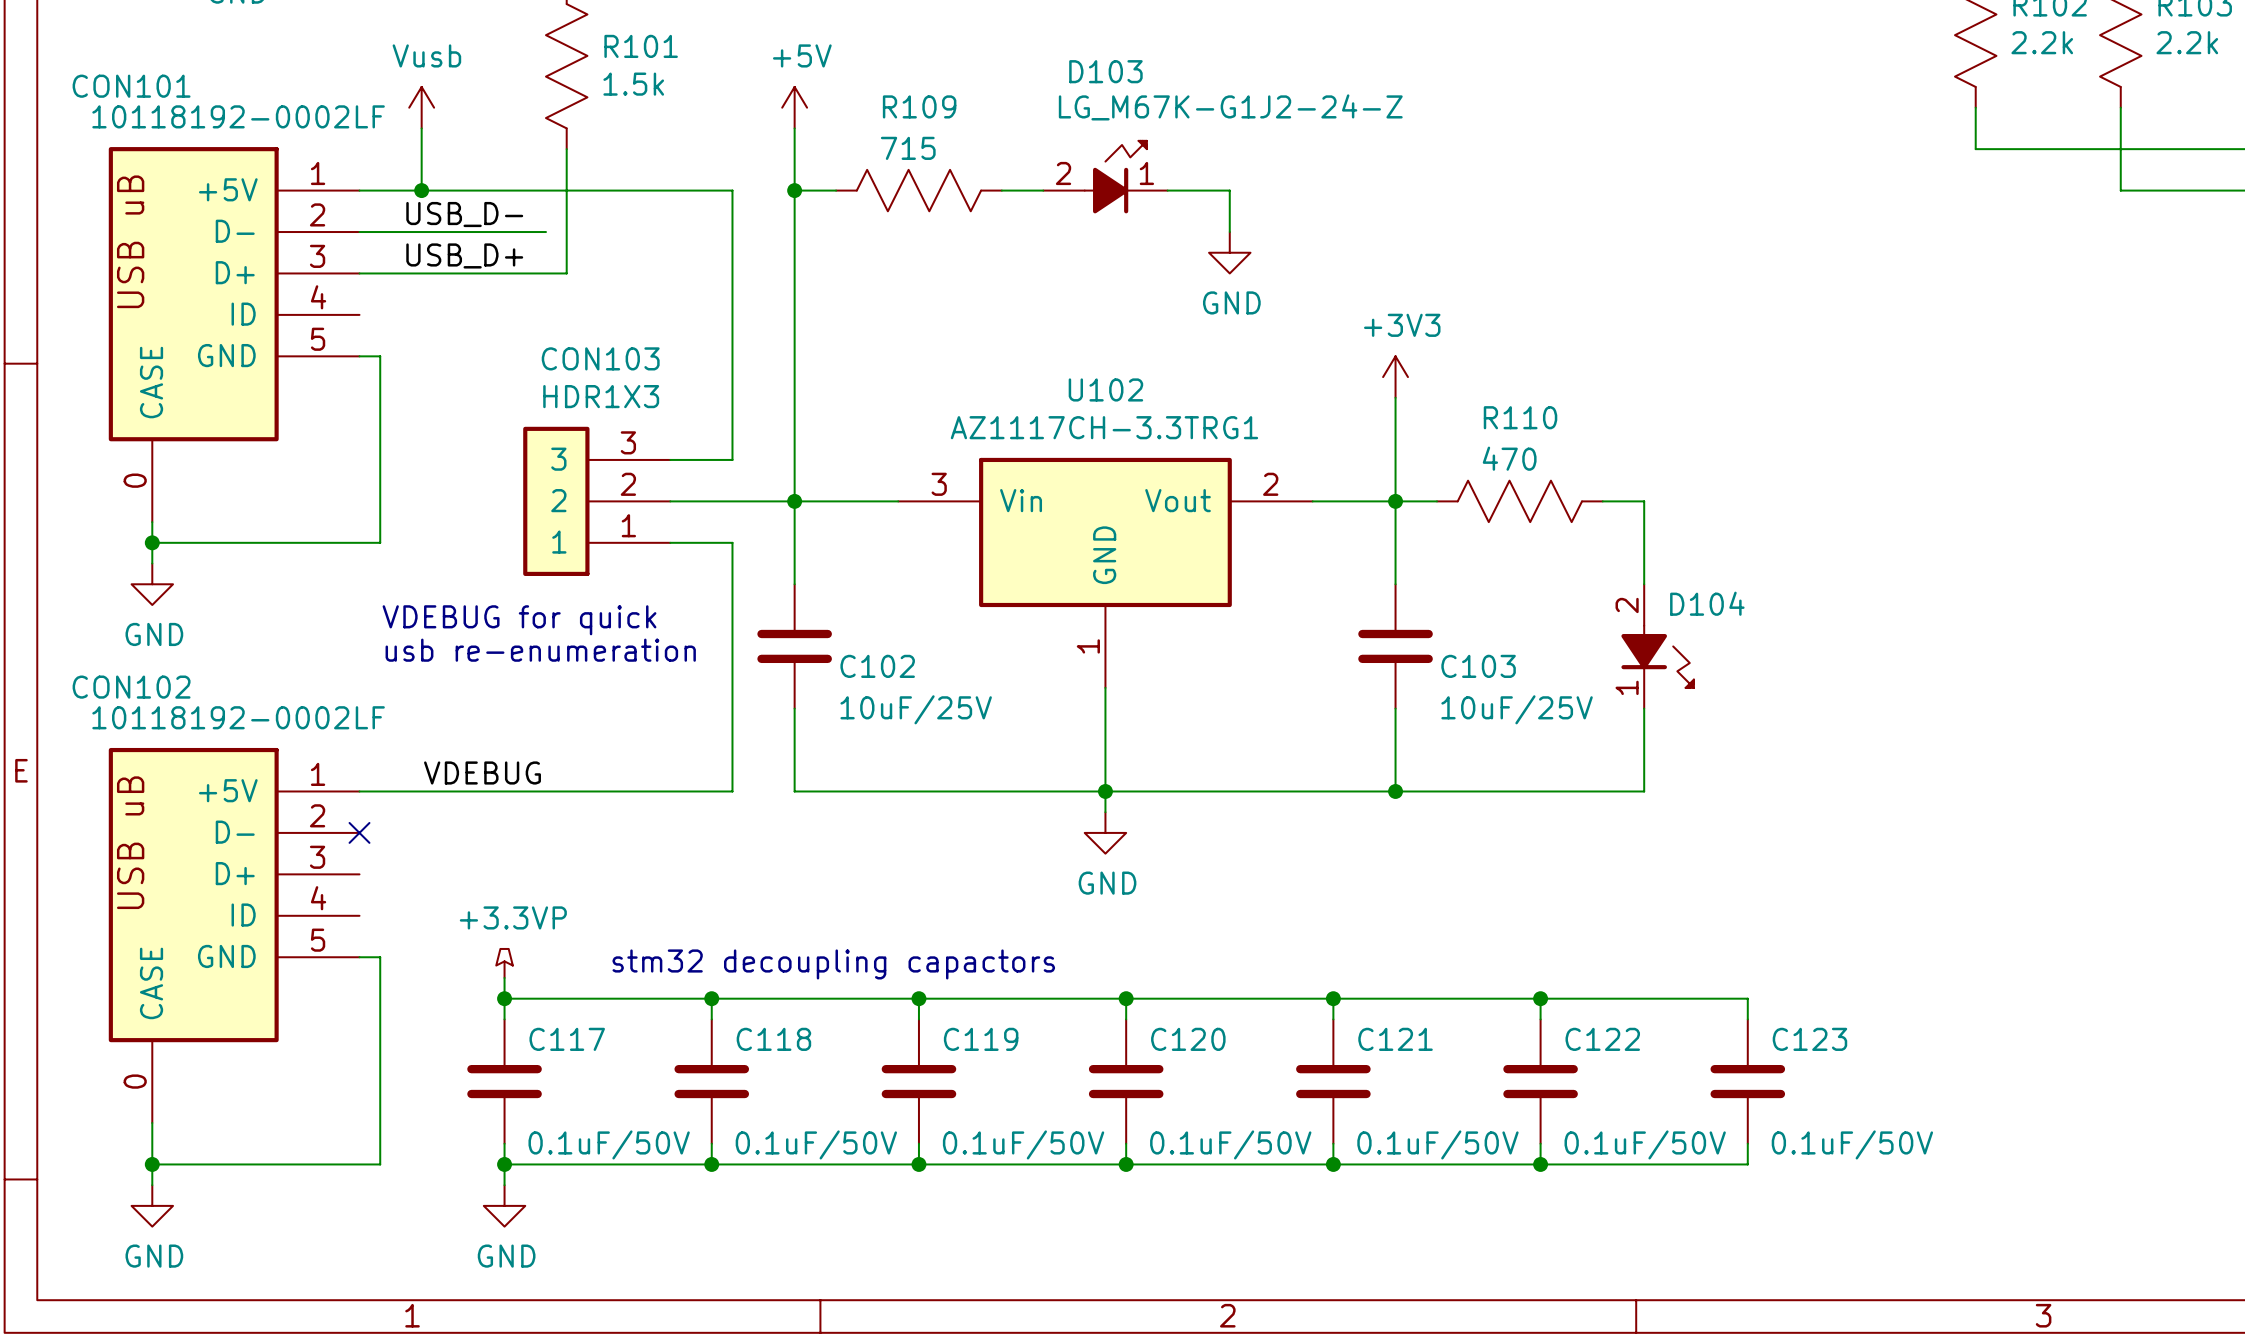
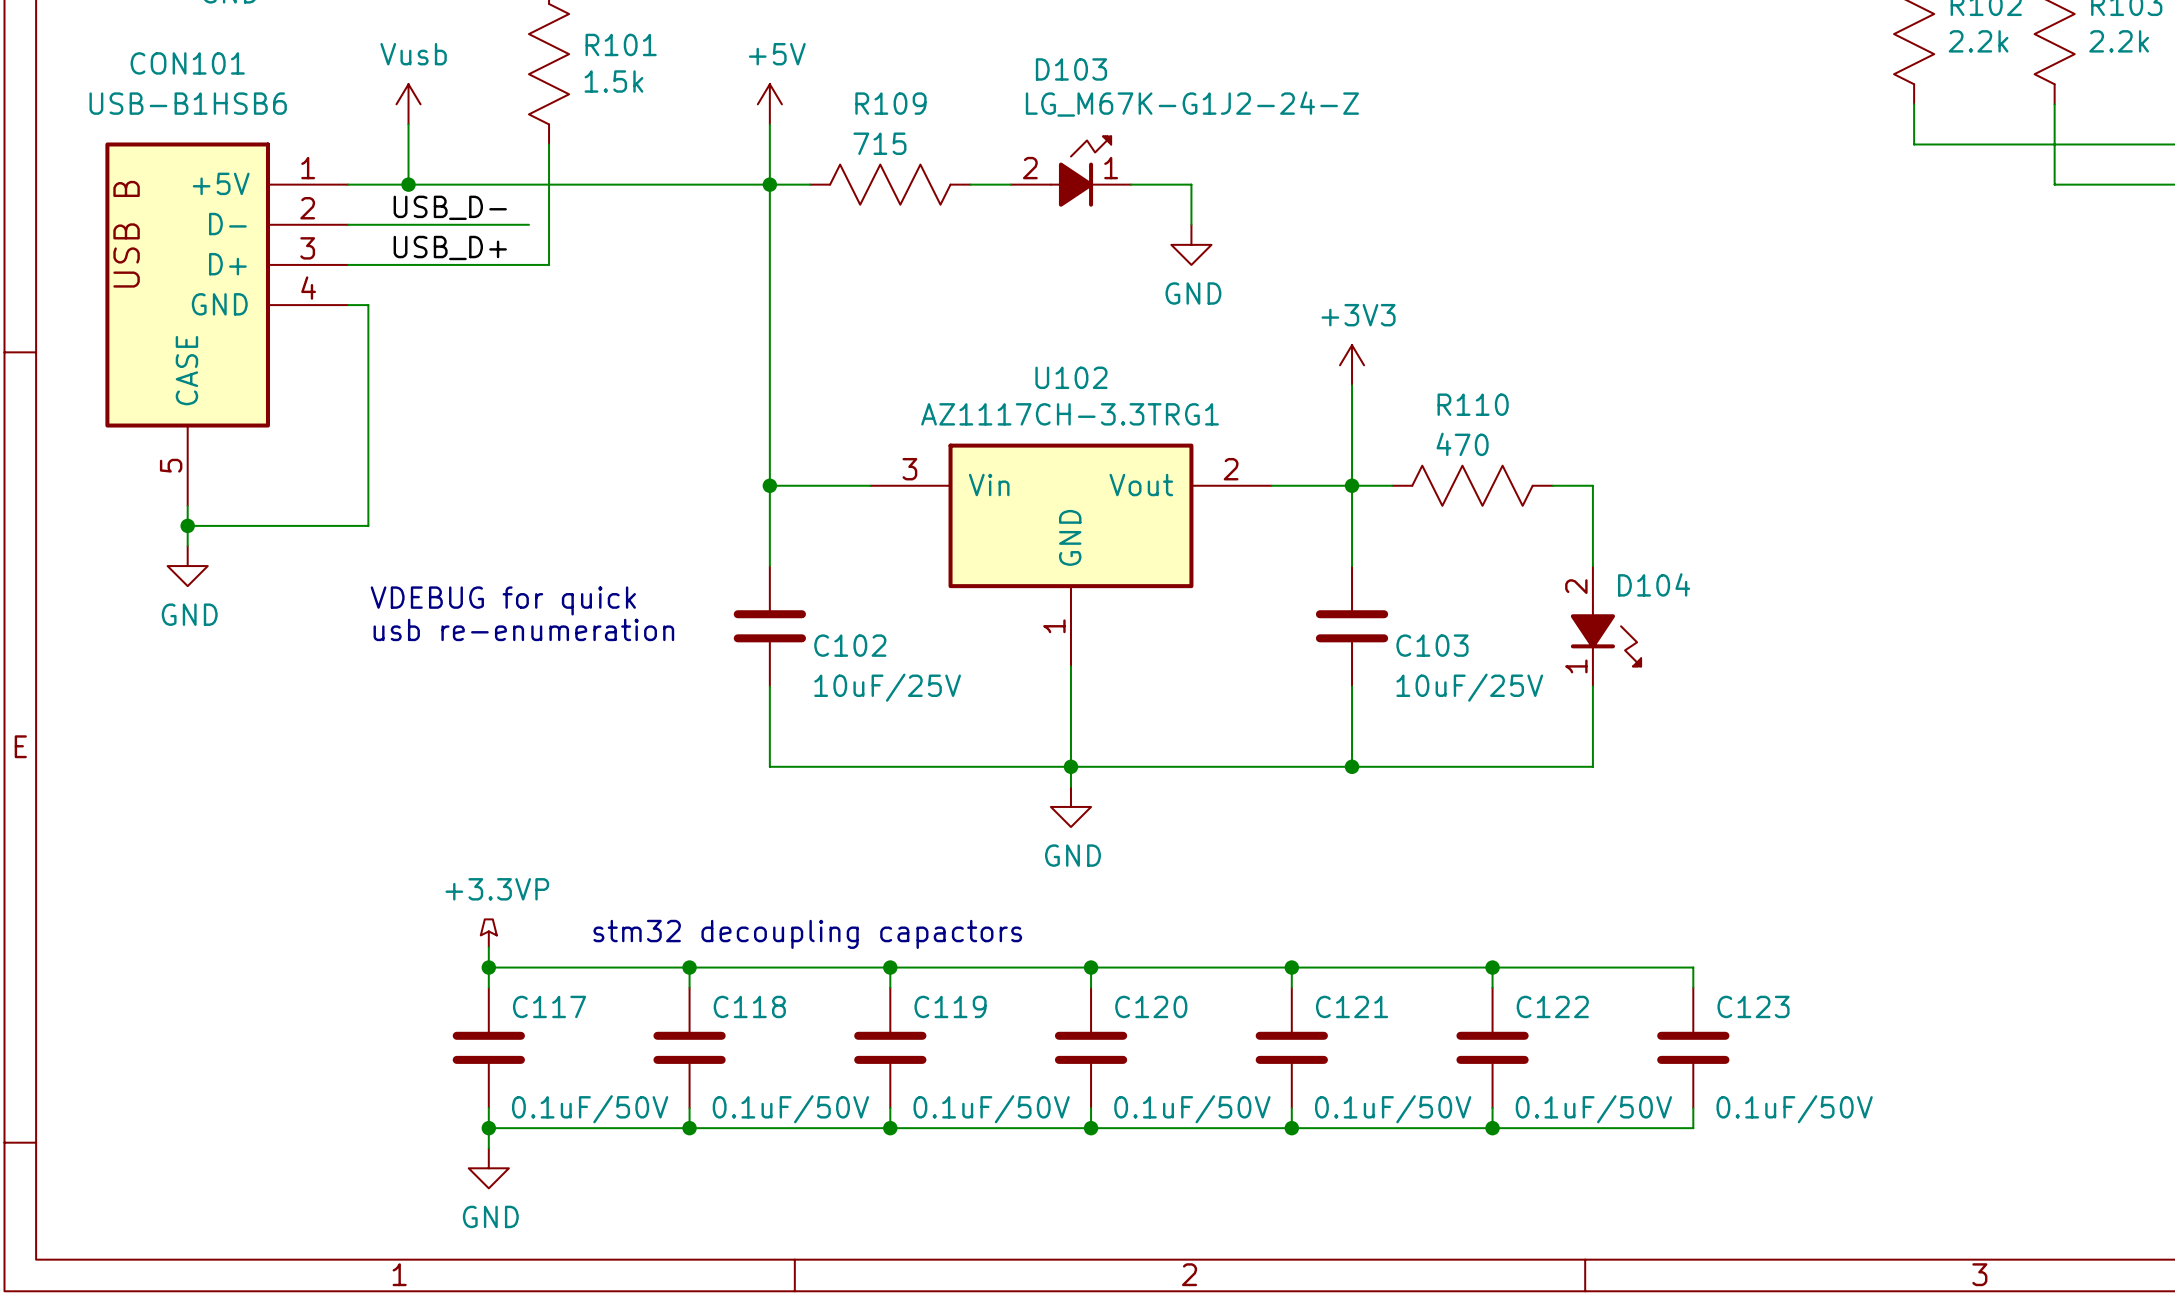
CON101 name position: CON101 (131, 86) -> CON101 (187, 63)
CON101 value: 10118192-0002LF (238, 116) -> USB-B1HSB6 (188, 103)
CON101 symbol: [108, 147, 360, 523] -> [105, 142, 349, 506]
wire: (732, 190) (732, 459) (670, 459) -> (709, 184) (769, 184)
wire: (359, 356) (380, 356) -> (348, 305) (368, 305) (368, 345)
CON103: HDR1X3 (596, 501) -> none
wire: (670, 501) (794, 501) -> none
wire: (152, 522) (152, 563) -> (187, 505) (187, 545)
wire: (152, 542) (193, 542) -> none
junction position: (152, 542) -> (187, 525)
wire: (670, 542) (732, 542) (732, 791) (359, 791) -> none
power symbol position: GND (152, 584) -> GND (187, 566)
label: VDEBUG (482, 772) -> none
no-connect mark: (359, 832) -> none
CON102: 10118192-0002LF (234, 935) -> none
wire: (359, 957) (380, 957) (380, 1164) (152, 1164) -> none
wire: (152, 1123) (152, 1185) -> none
junction: (152, 1164) -> none
power symbol: GND (152, 1205) -> none

